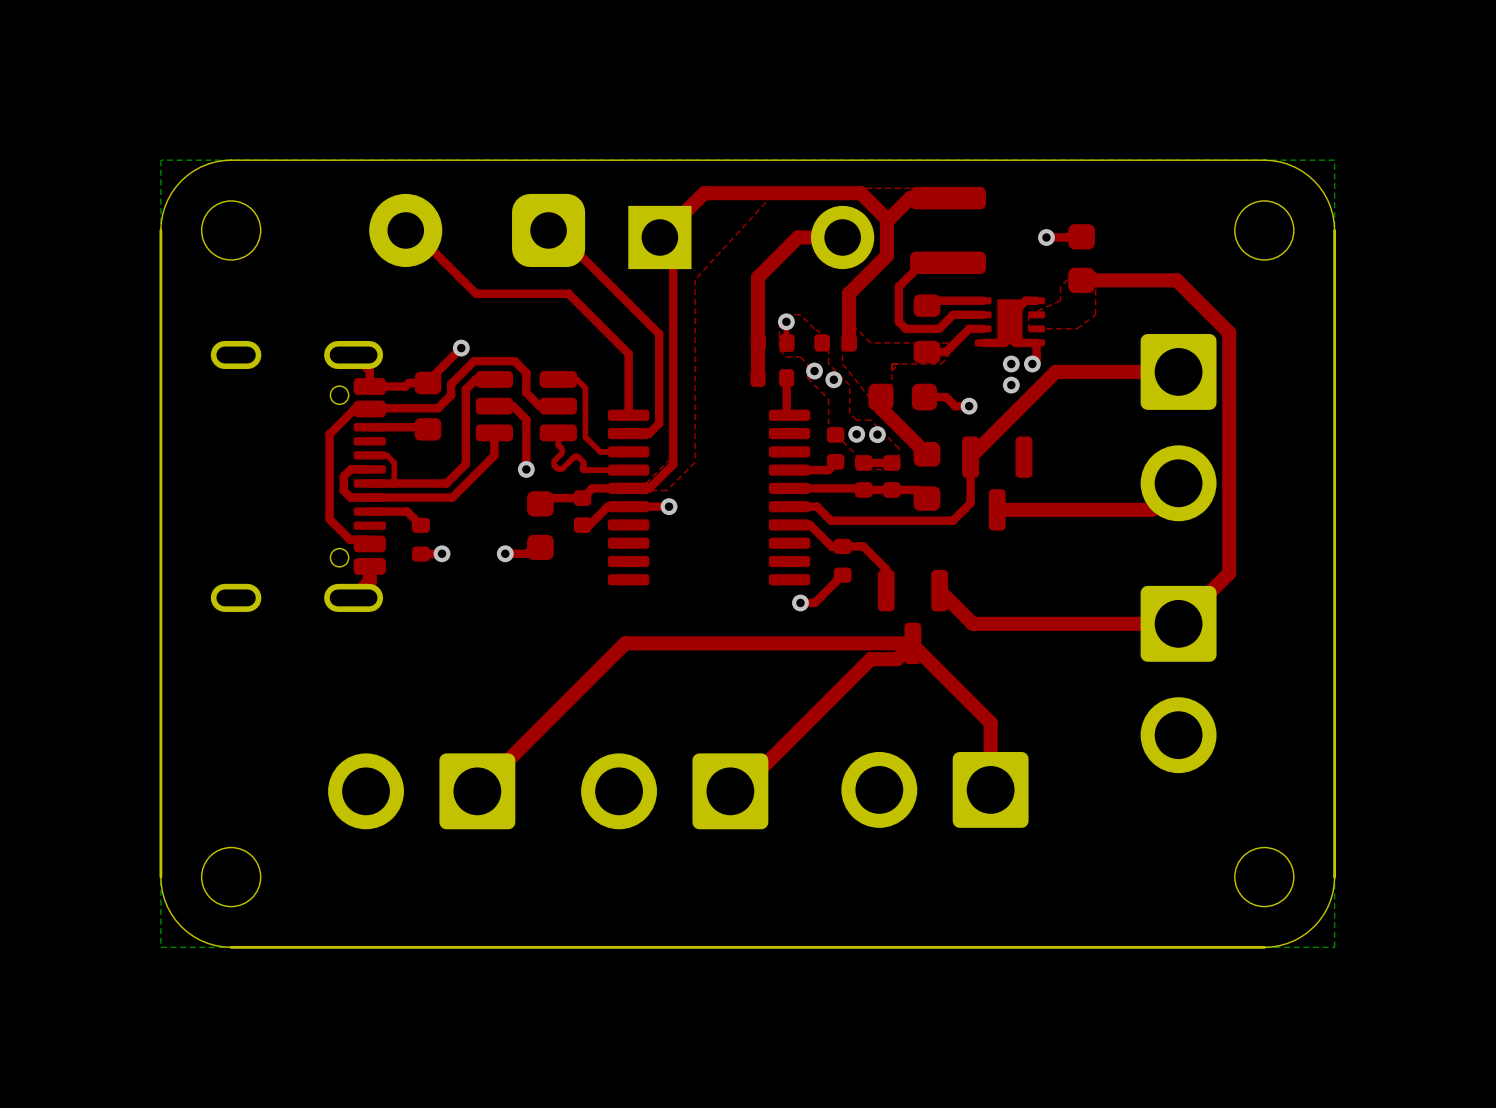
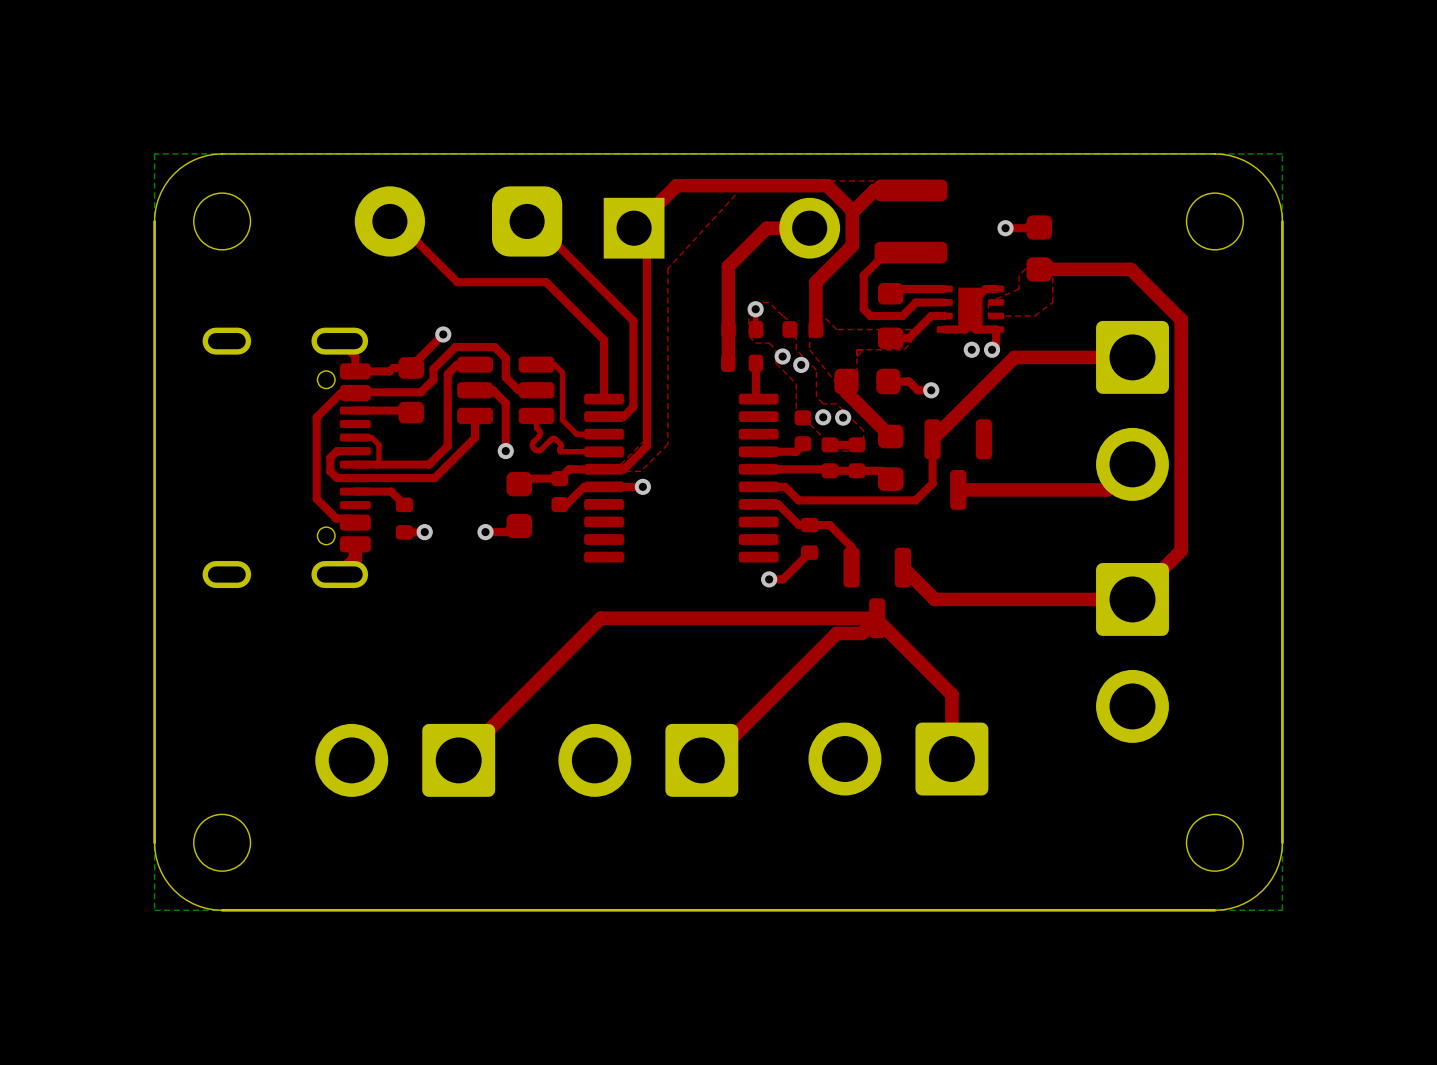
via: (1011, 385) -> none

